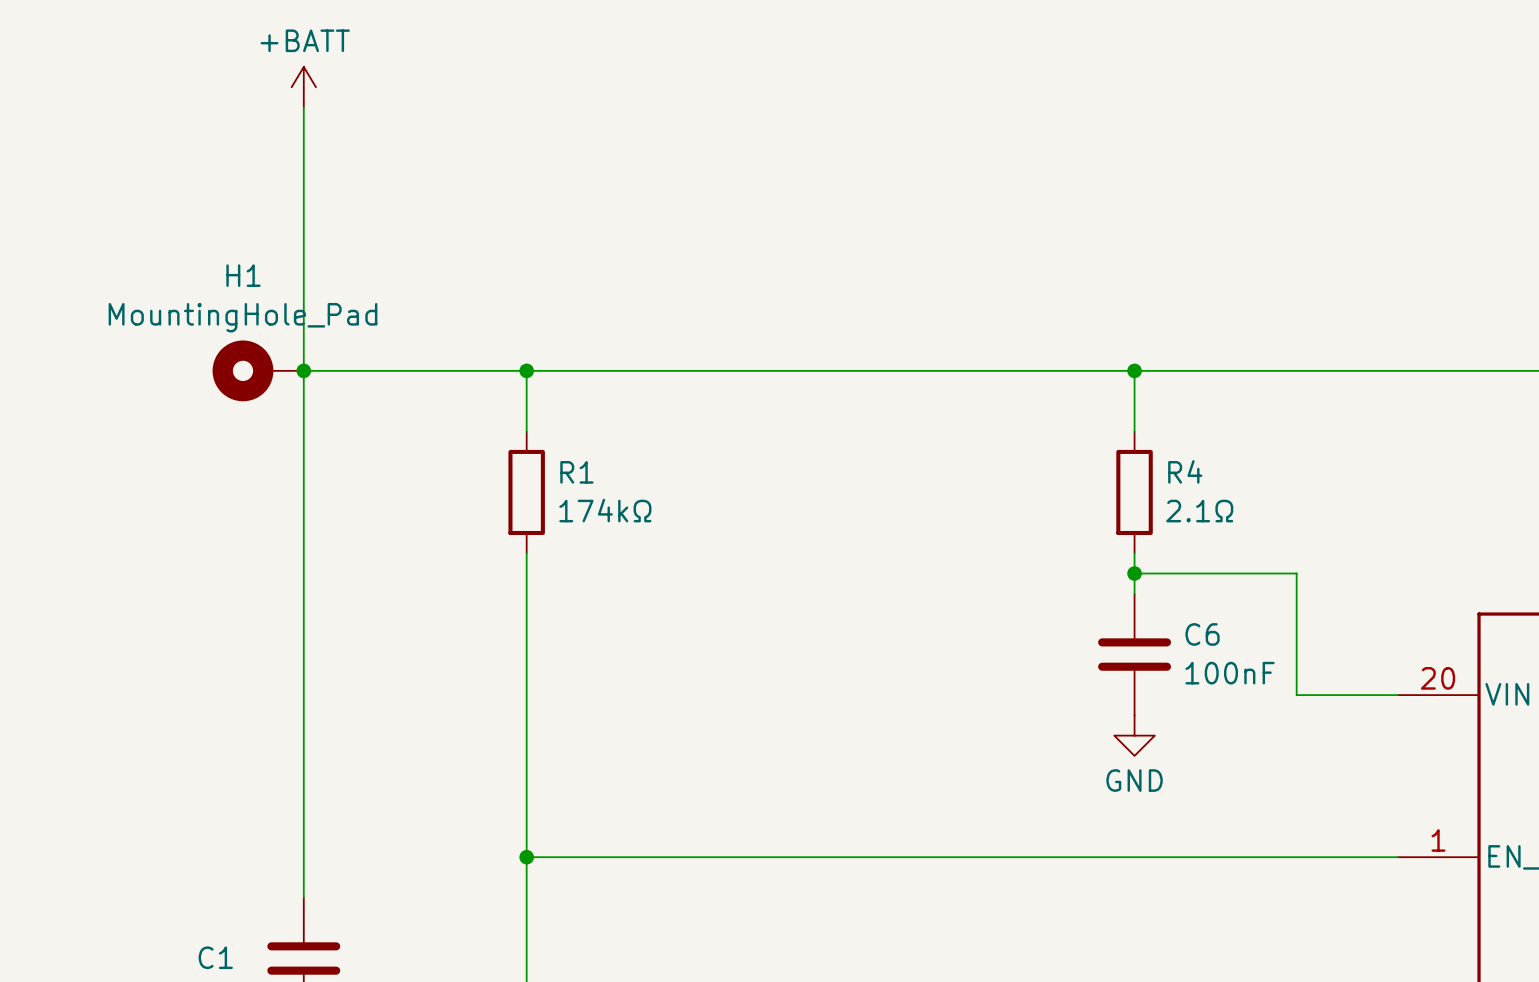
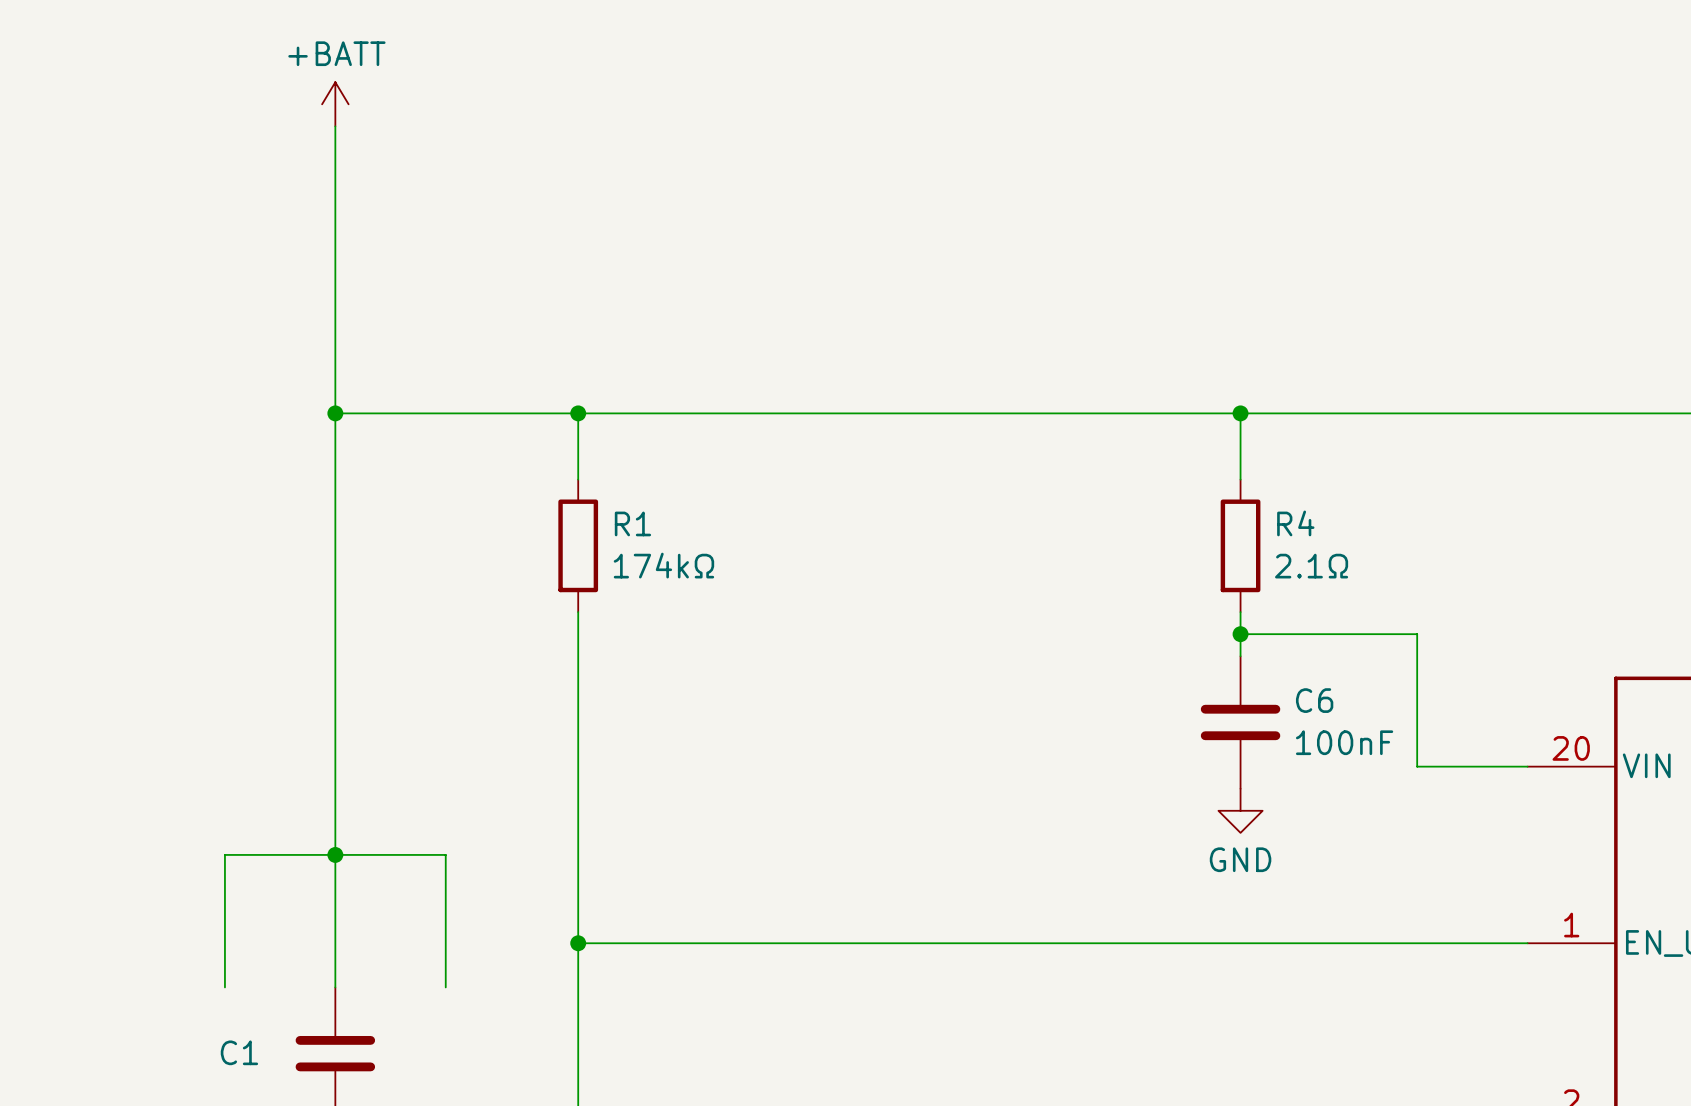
H1: MountingHole_Pad (258, 370) -> none
junction: none -> (335, 854)
wire: none -> (224, 987) (224, 854) (445, 854) (445, 987)

